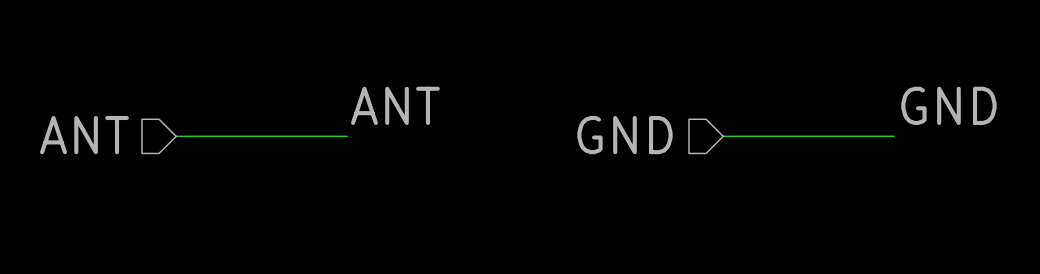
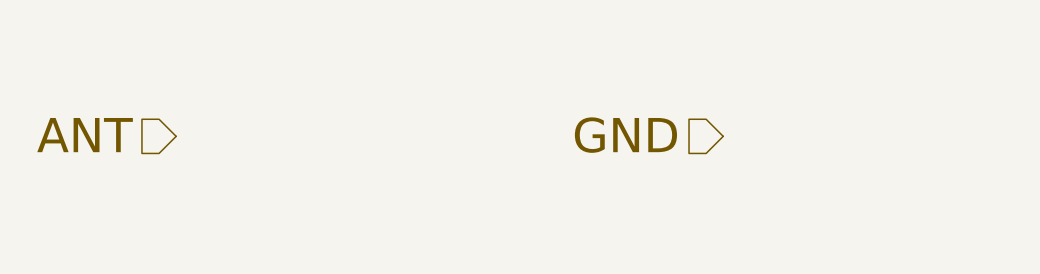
label: ANT (395, 105) -> none
label: GND (948, 105) -> none
wire: (176, 136) (347, 136) -> none
wire: (723, 136) (894, 136) -> none

